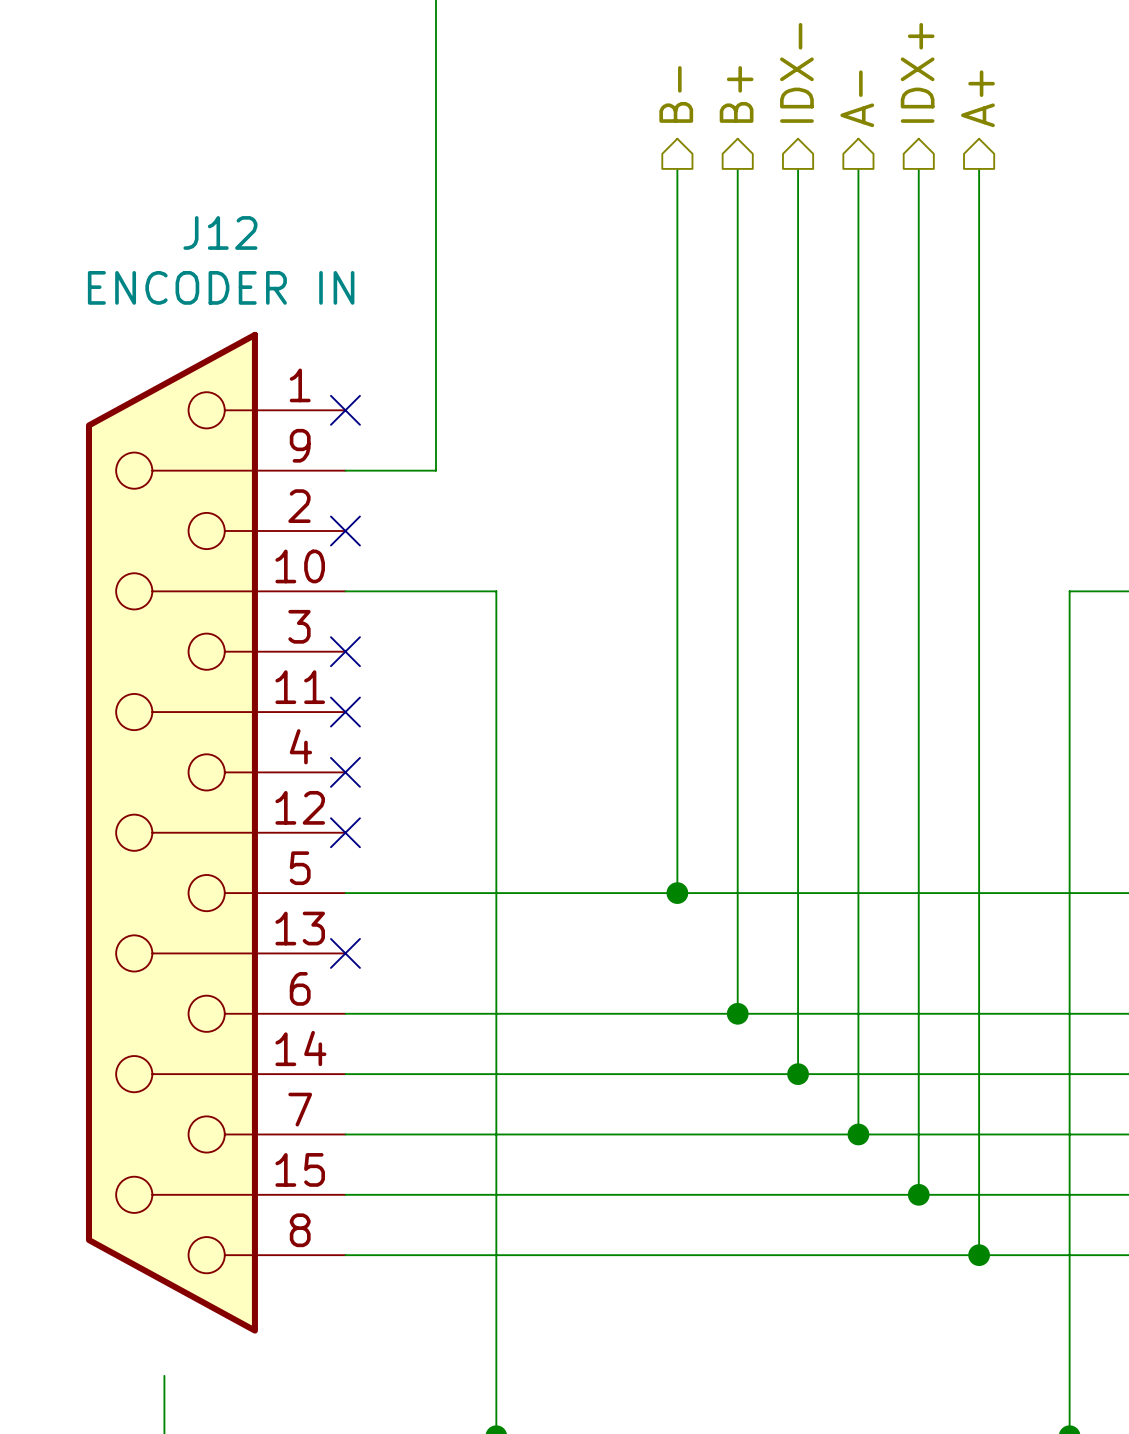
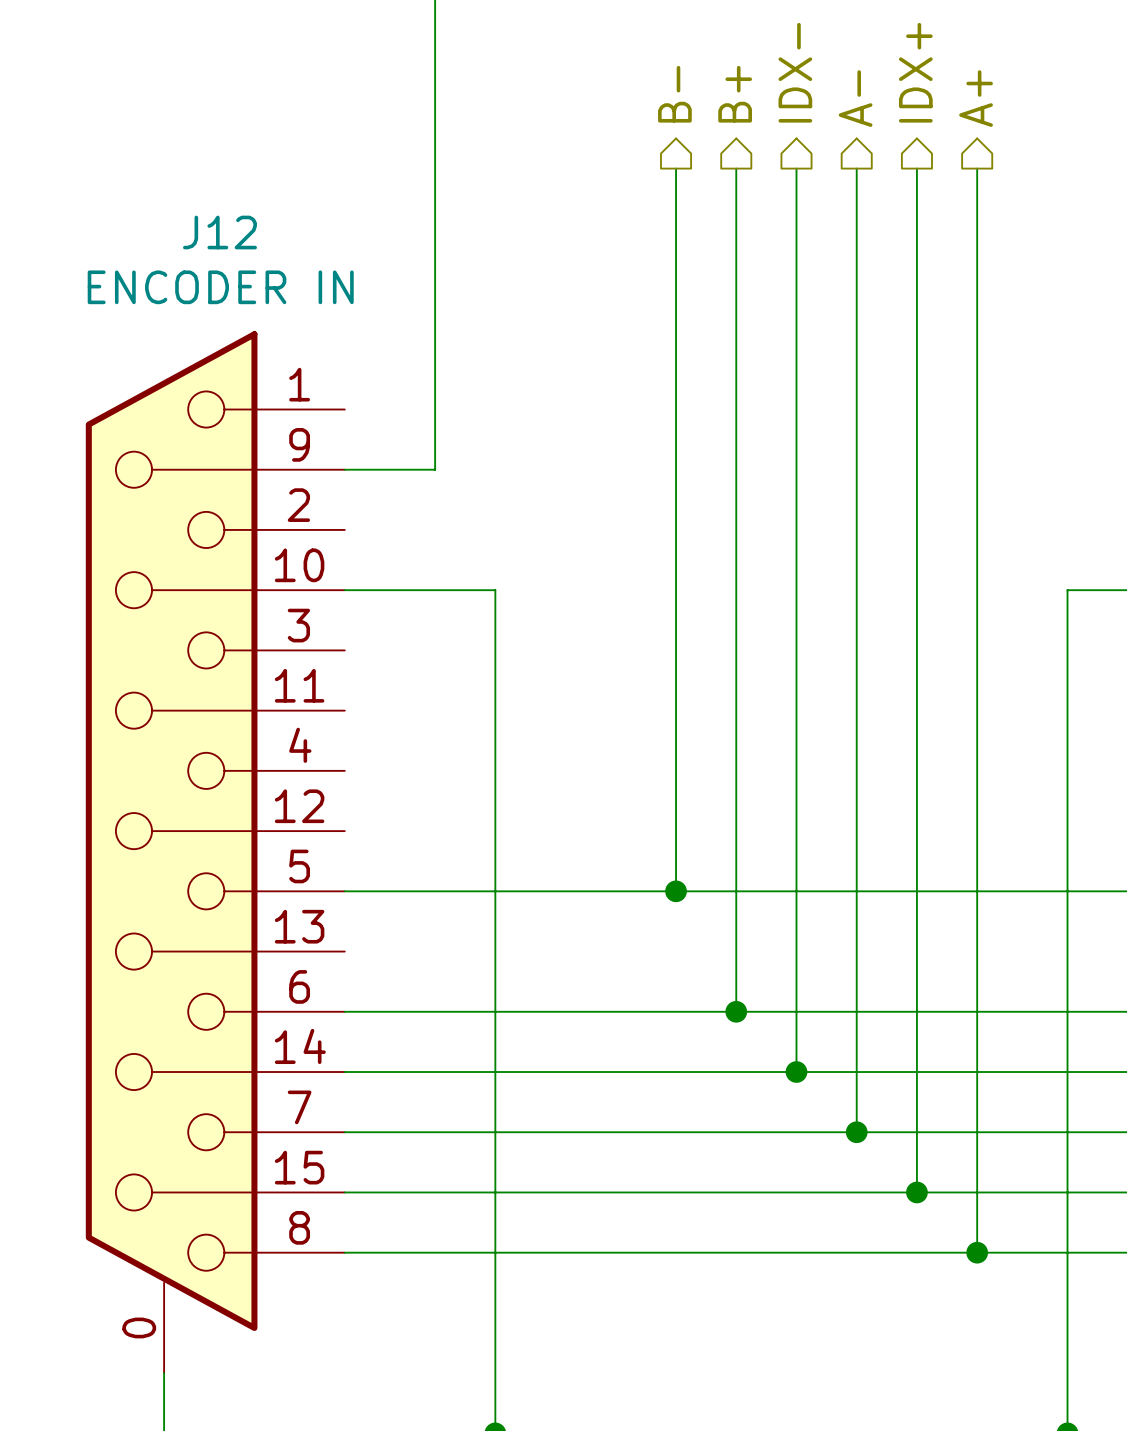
J12 symbol: [85, 331, 346, 1334] -> [85, 331, 345, 1374]
no-connect mark: (345, 410) -> none
no-connect mark: (345, 531) -> none
no-connect mark: (345, 651) -> none
no-connect mark: (345, 712) -> none
no-connect mark: (345, 772) -> none
no-connect mark: (345, 832) -> none
no-connect mark: (345, 953) -> none

